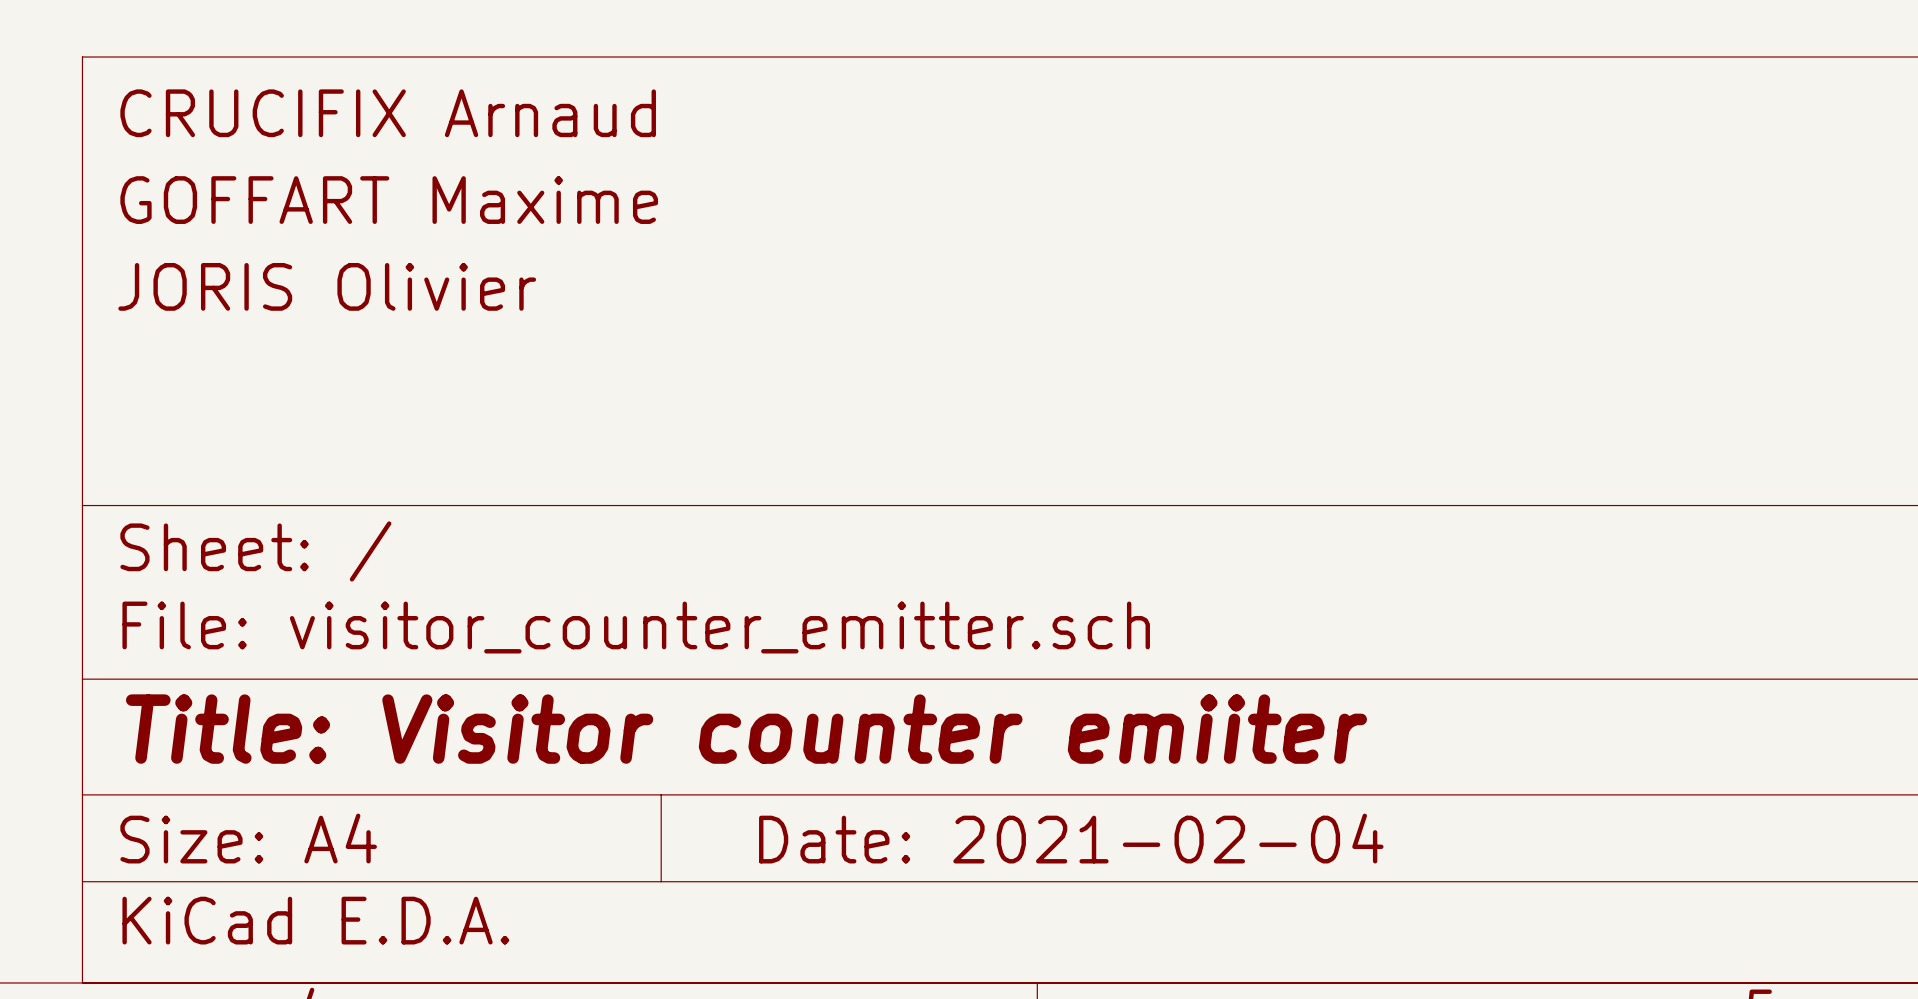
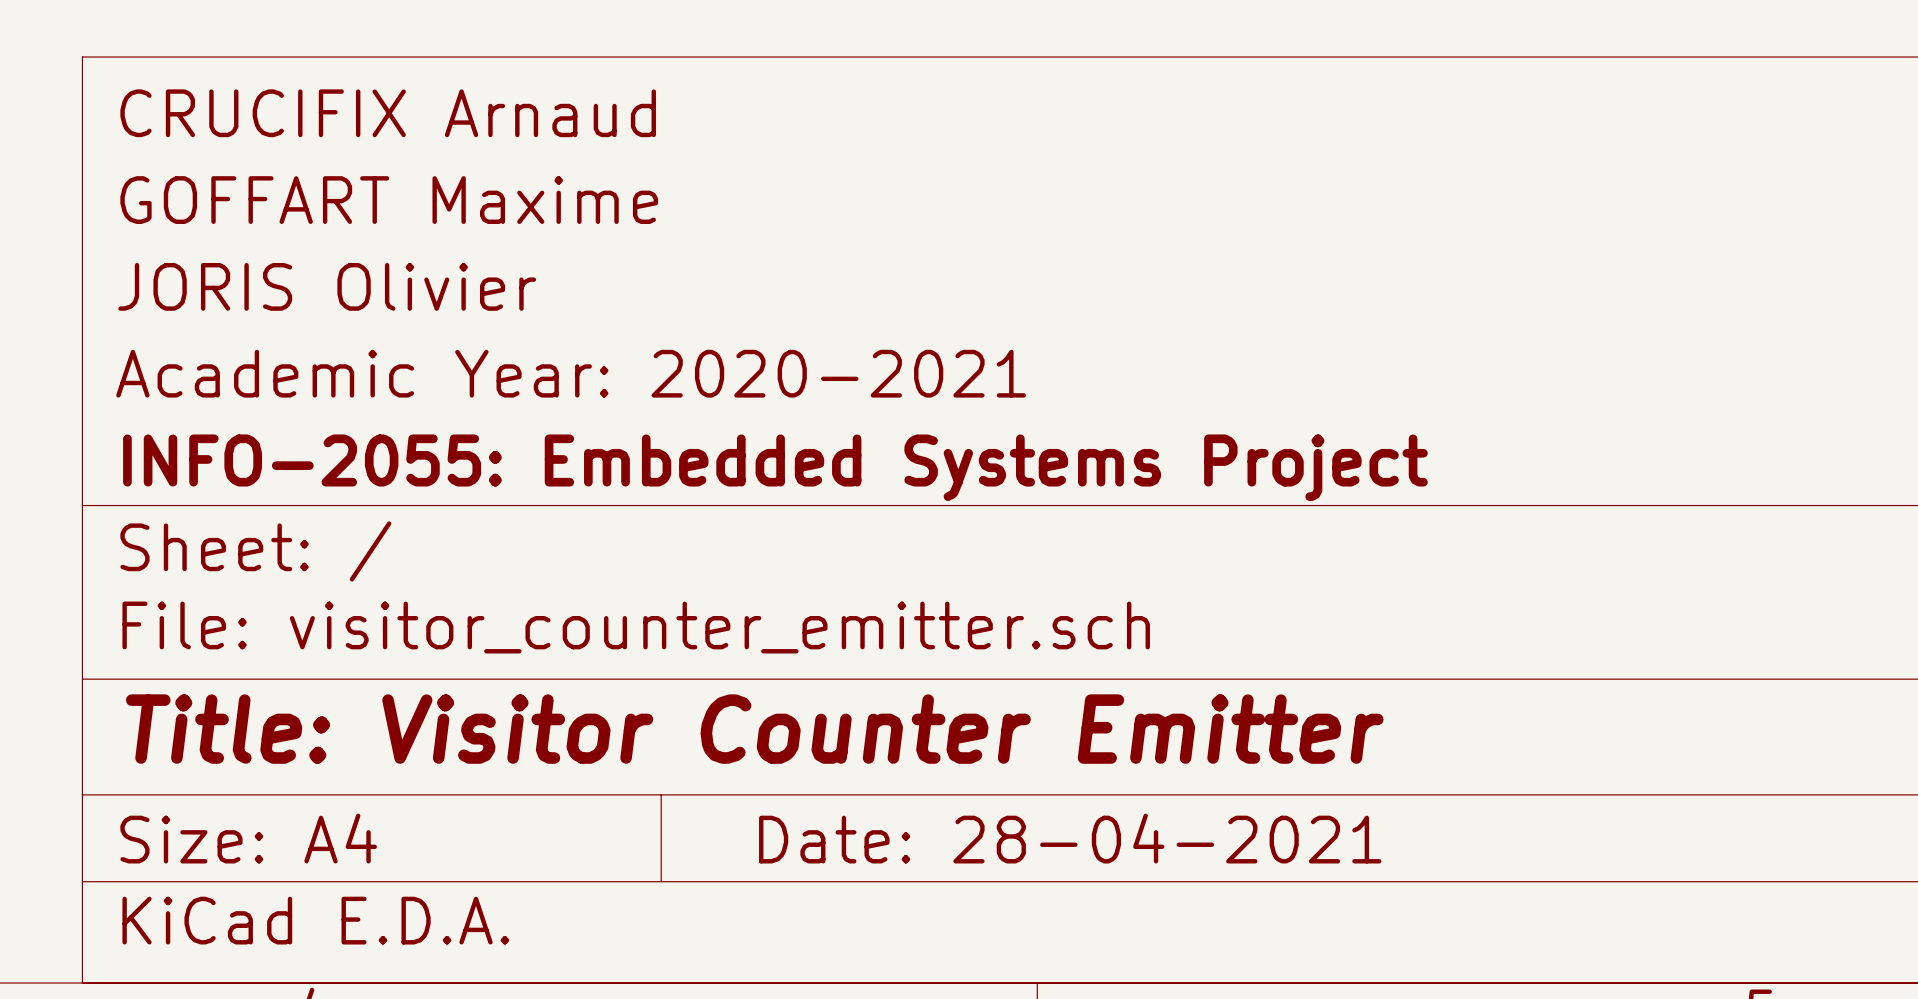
title block: none -> Academic Year: 2020-2021 (571, 373)
title block: none -> INFO-2055: Embedded Systems Project (775, 467)
title block: Title: Visitor counter emiiter (746, 729) -> Title: Visitor Counter Emitter (754, 729)
title block: Date: 2021-02-04 (1071, 838) -> Date: 28-04-2021 (1070, 838)

